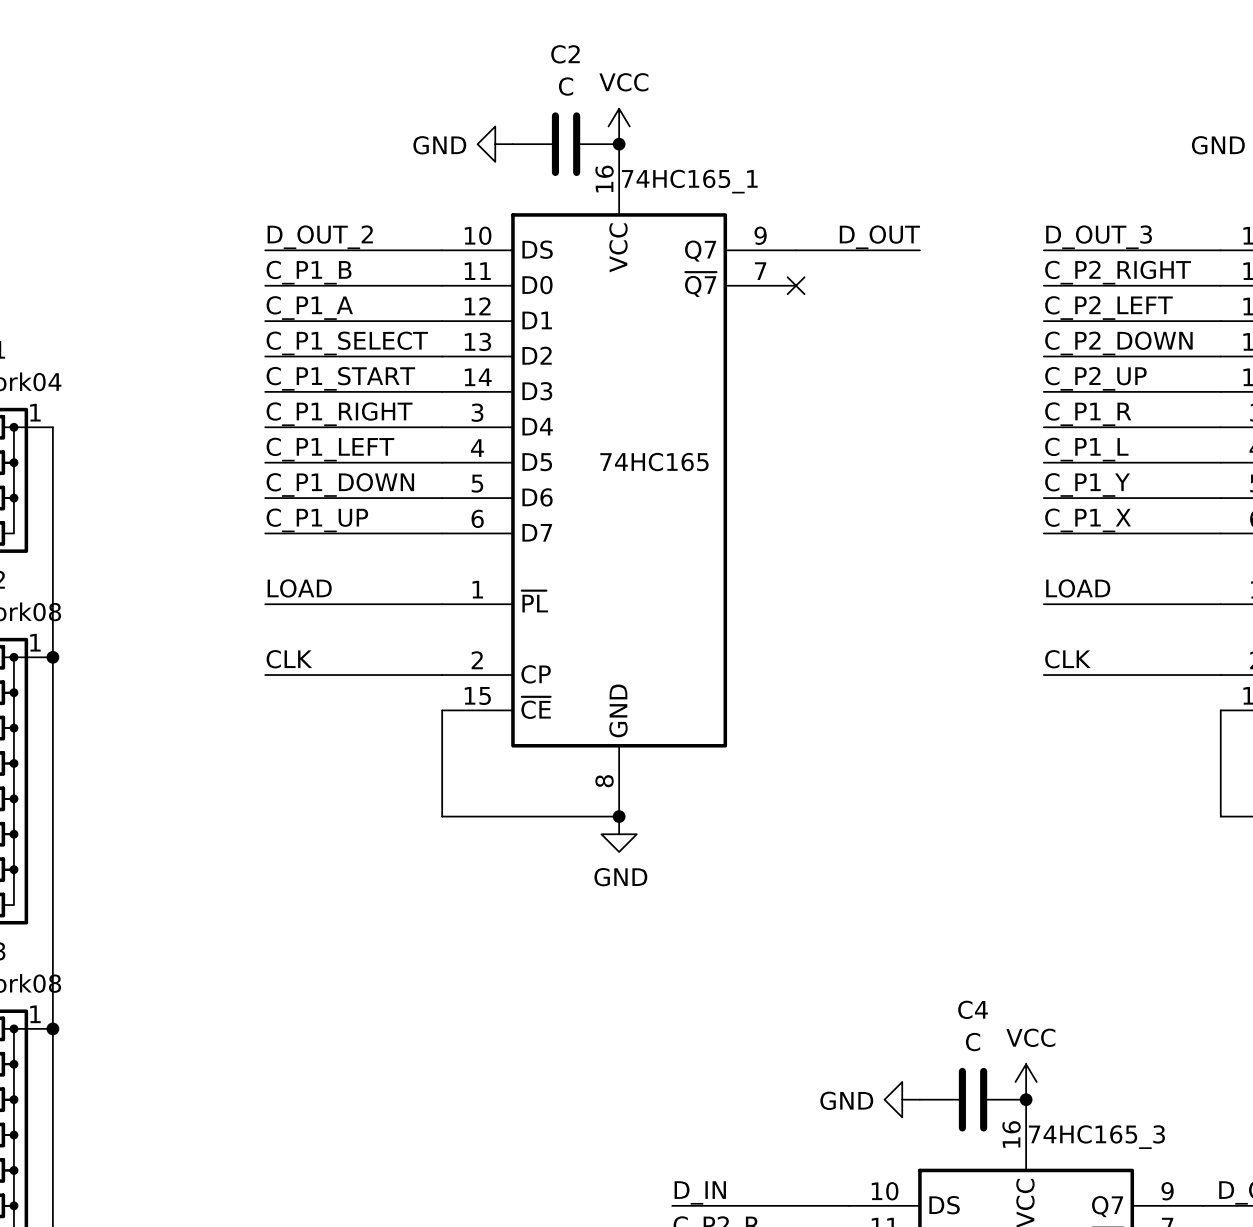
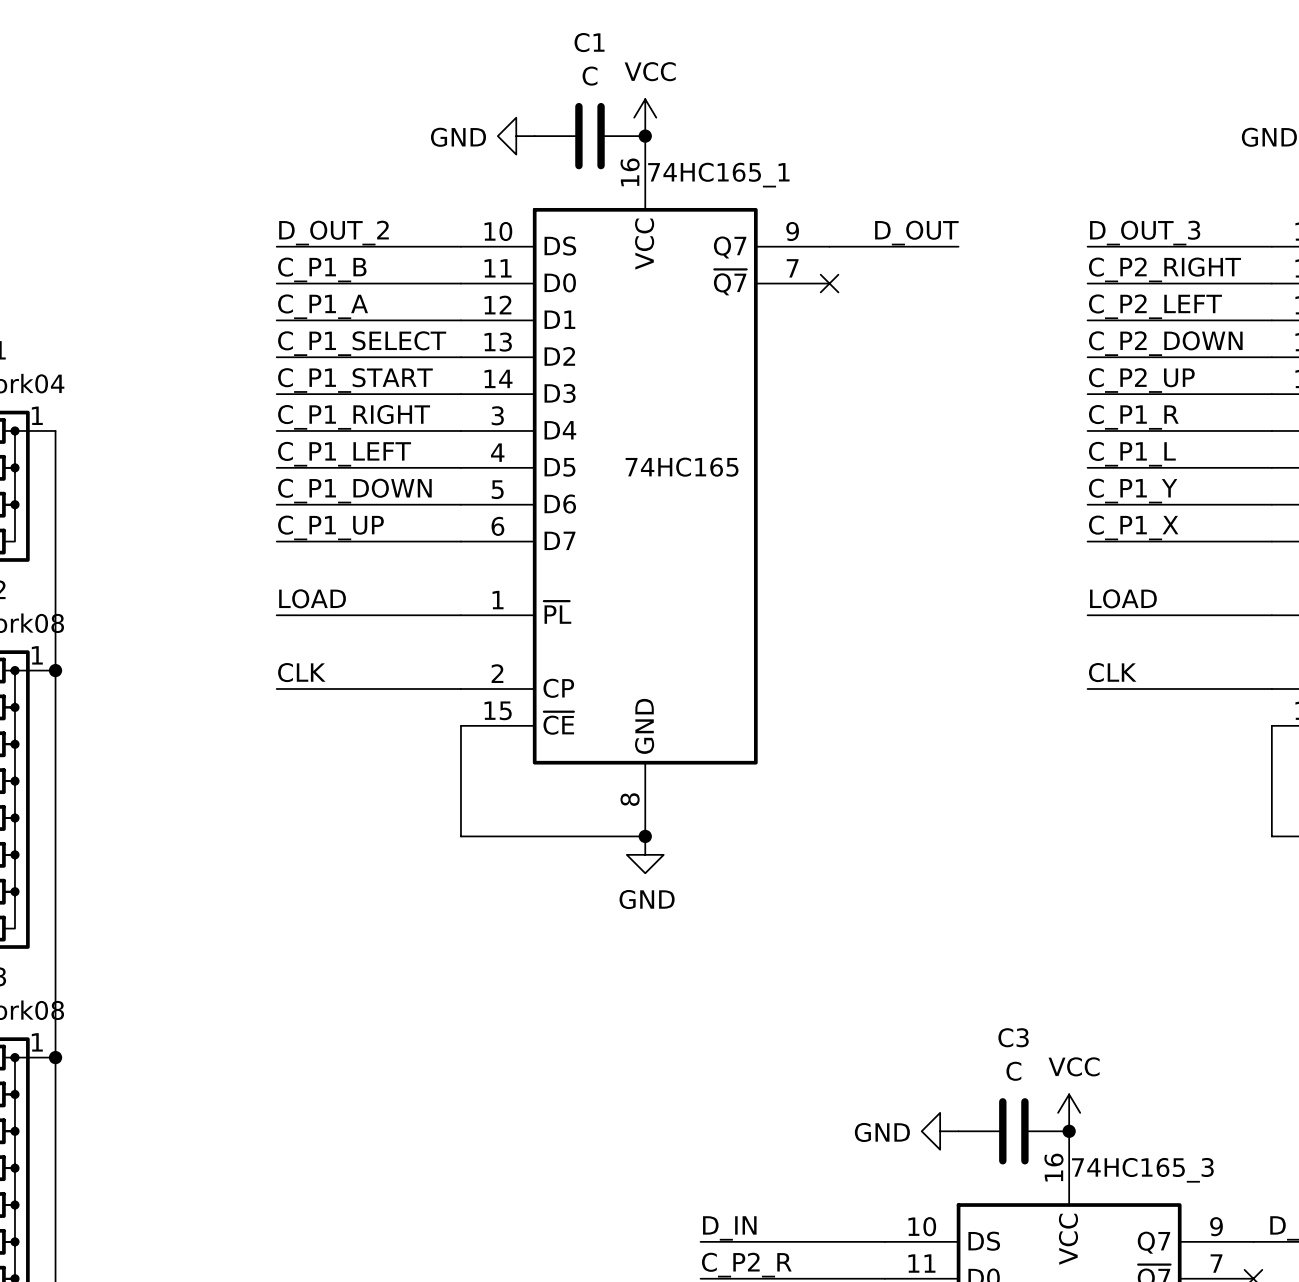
C2 name: C2 (565, 54) -> C1 (589, 42)
C4 name: C4 (973, 1009) -> C3 (1013, 1037)

